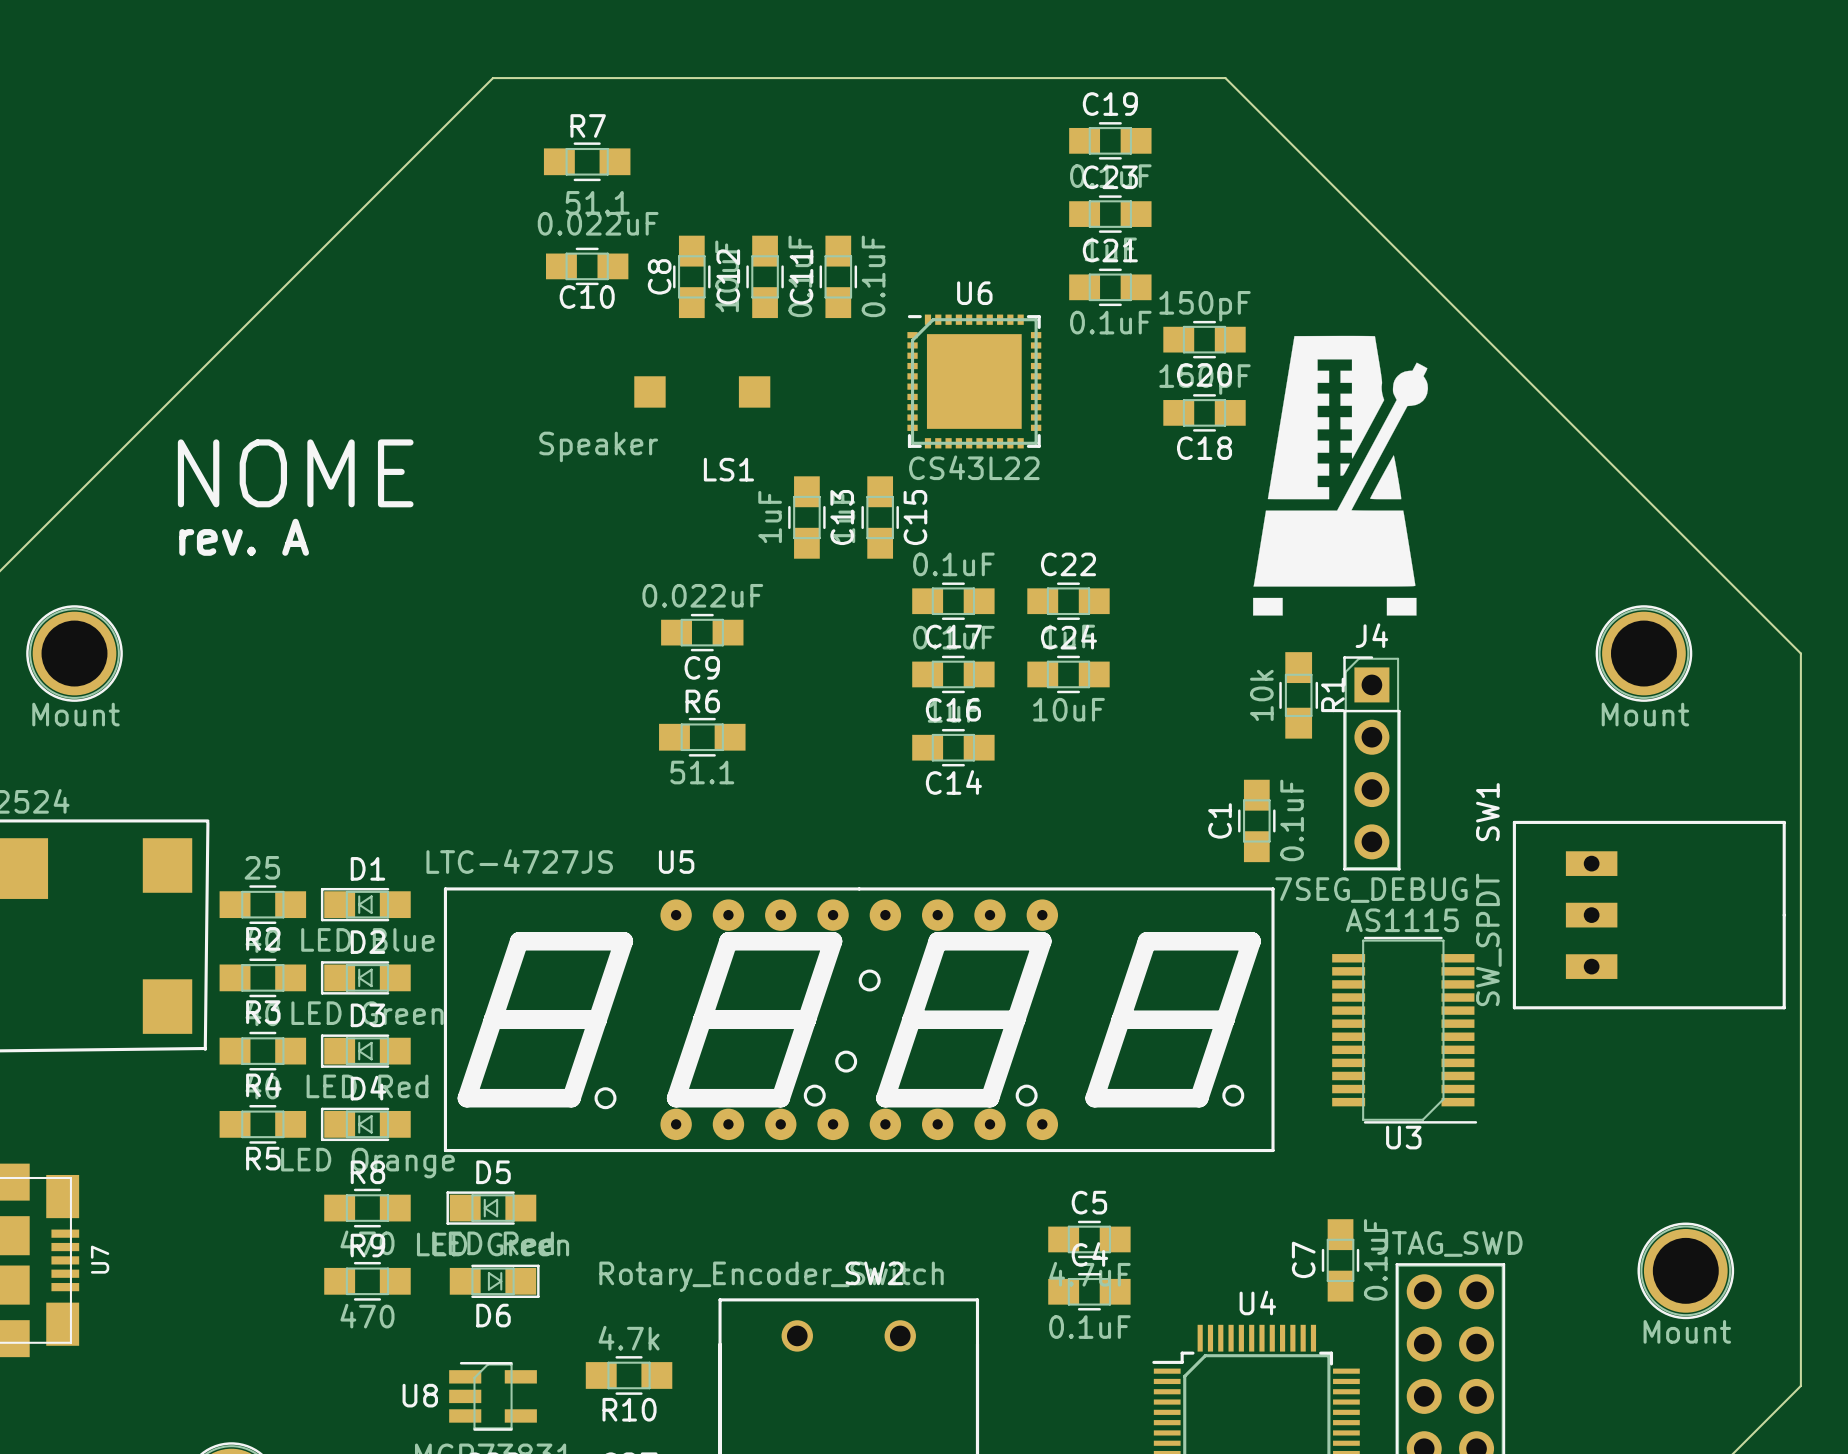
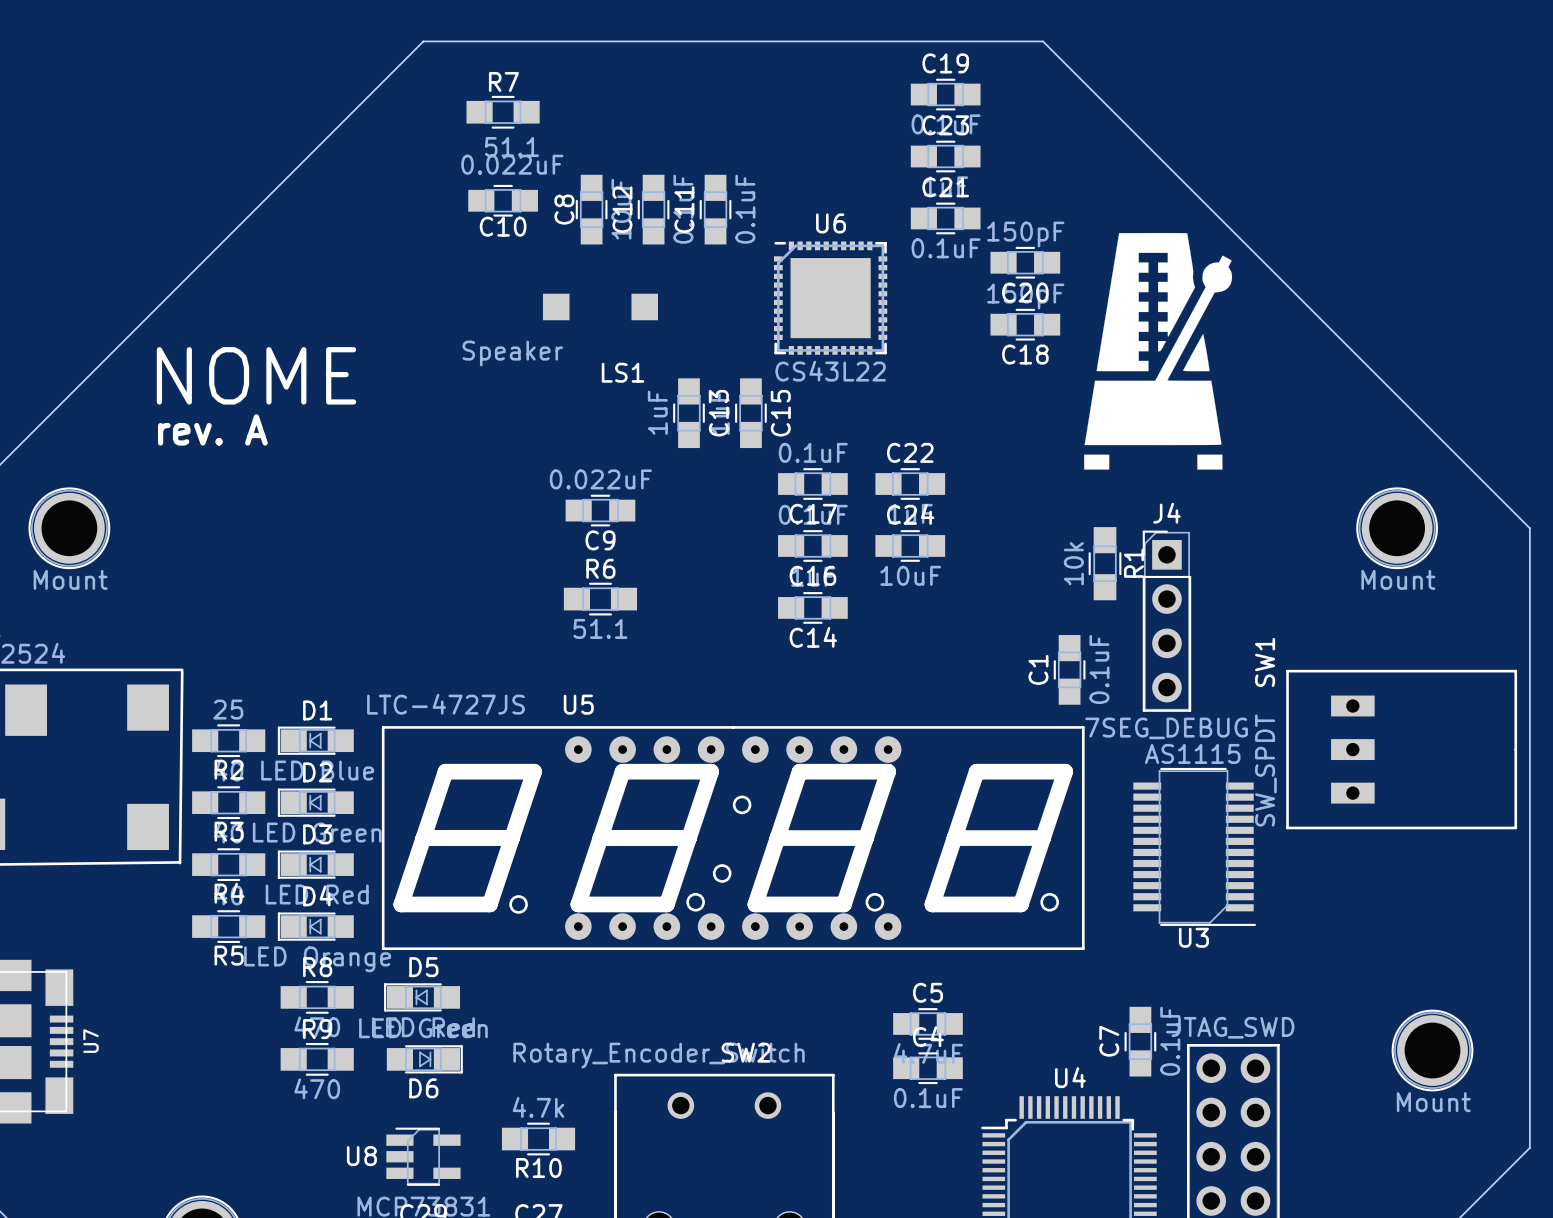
drawing position: (1340, 475) -> (1158, 351)

